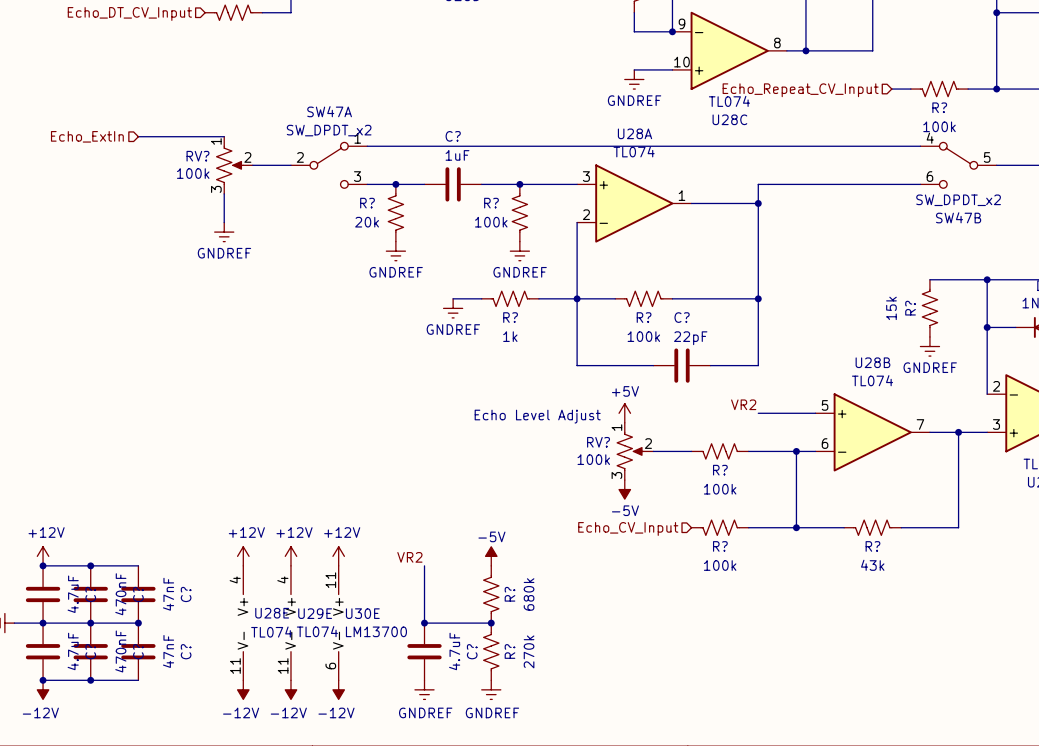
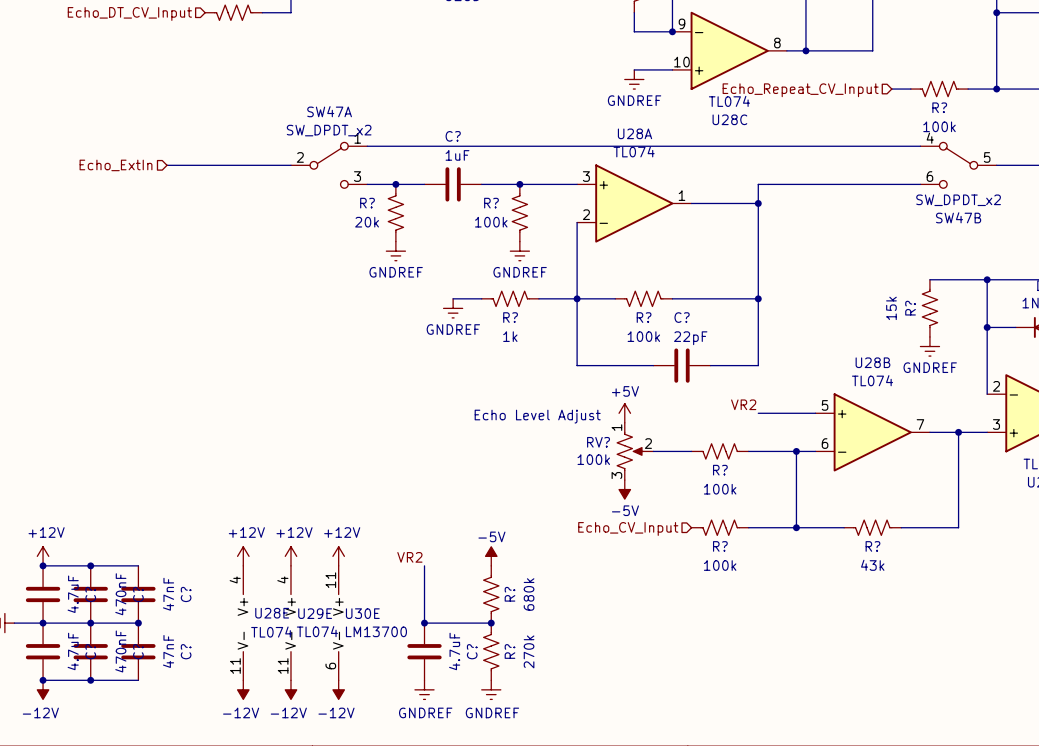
hierarchical label position: Echo_ExtIn (87, 136) -> Echo_ExtIn (116, 165)
wire: (138, 136) (224, 136) -> (167, 165) (252, 165)
RV?: 100k (234, 165) -> none
wire: (224, 193) (224, 222) -> none
power symbol: GNDREF (224, 232) -> none

